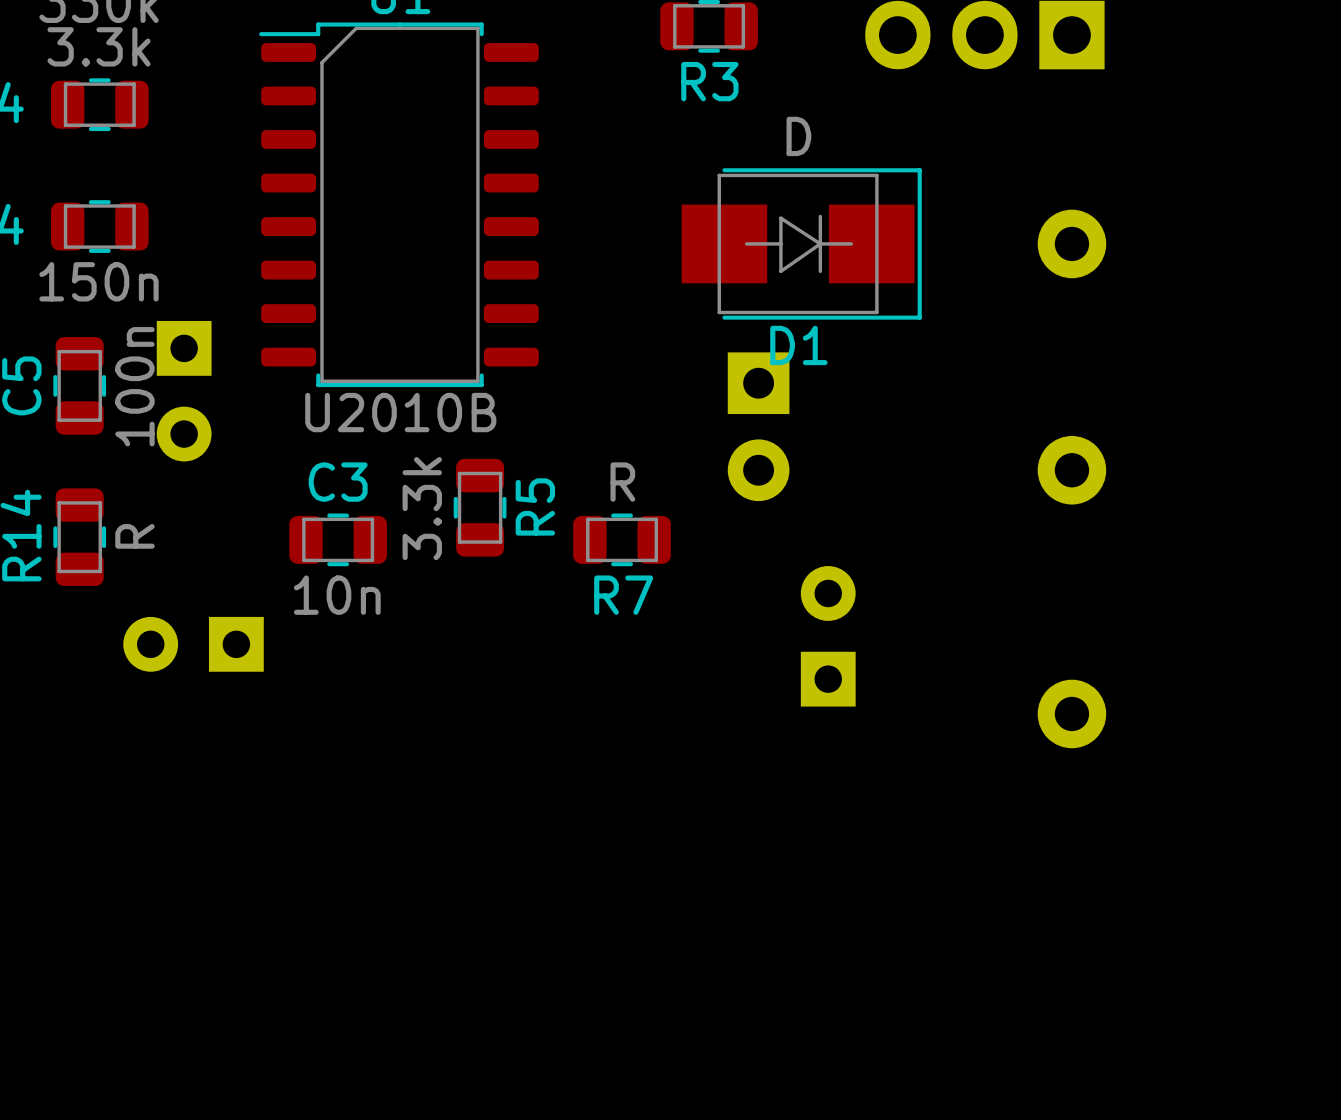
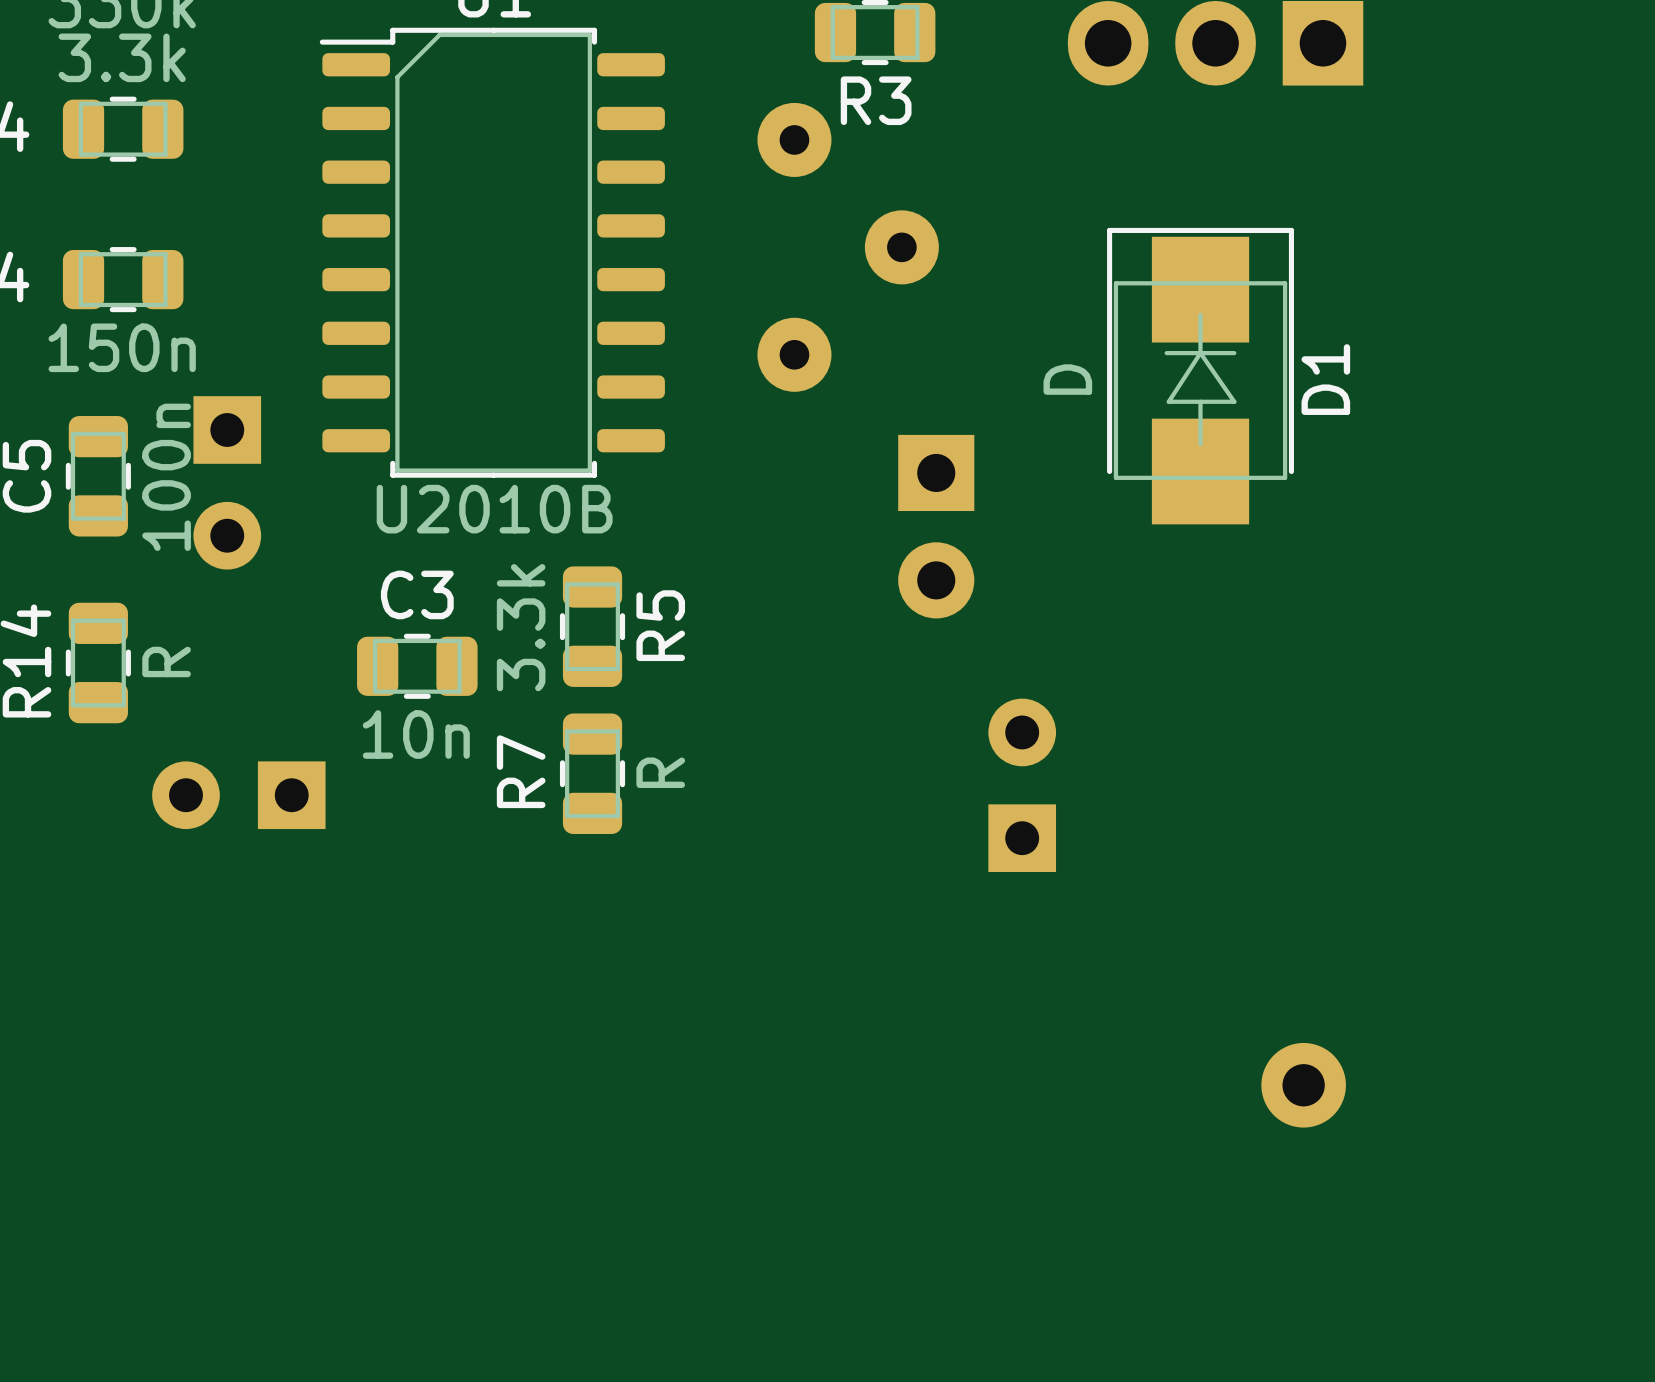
part: none -> (848, 247)
D1 rotation: 0° (801, 243) -> 90° counterclockwise (1200, 376)
D1 position: (801, 243) -> (1200, 376)
part: (1071, 243) -> none
part: (1071, 470) -> none
R7 rotation: 0° (622, 539) -> 90° clockwise (592, 773)
R7 position: (622, 539) -> (592, 773)
part position: (1071, 713) -> (1303, 1085)

